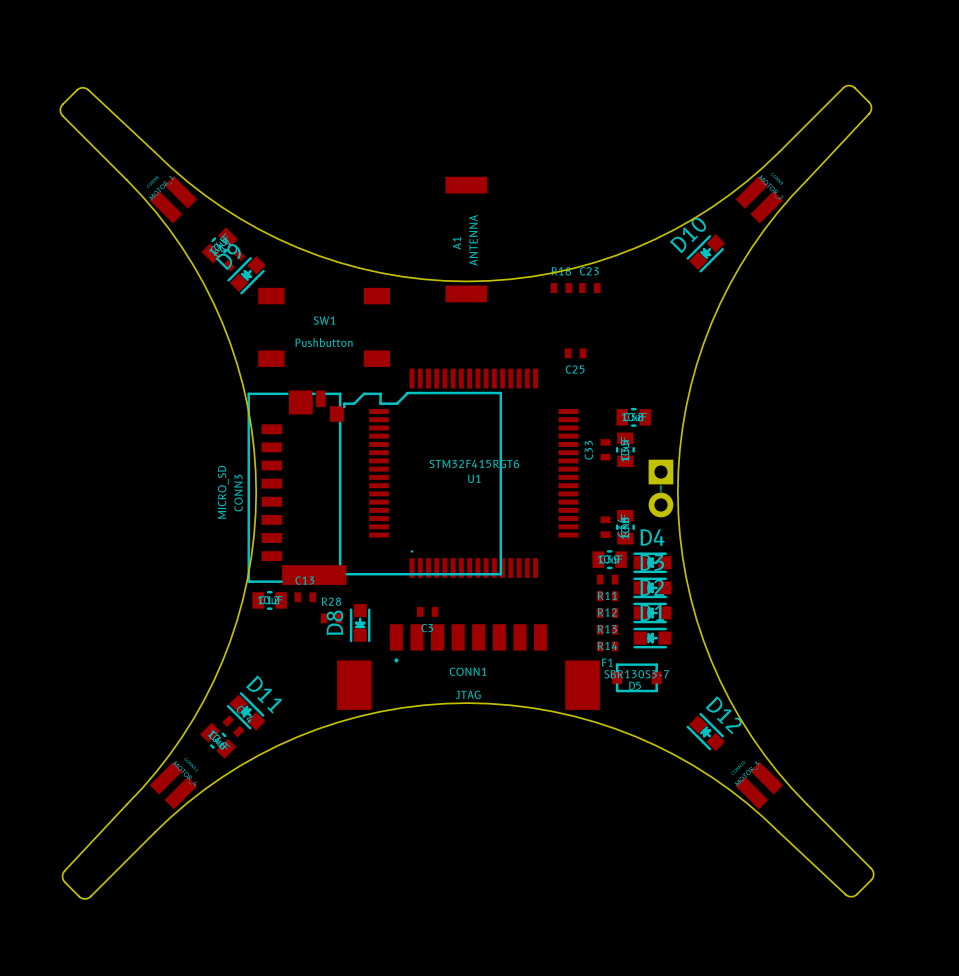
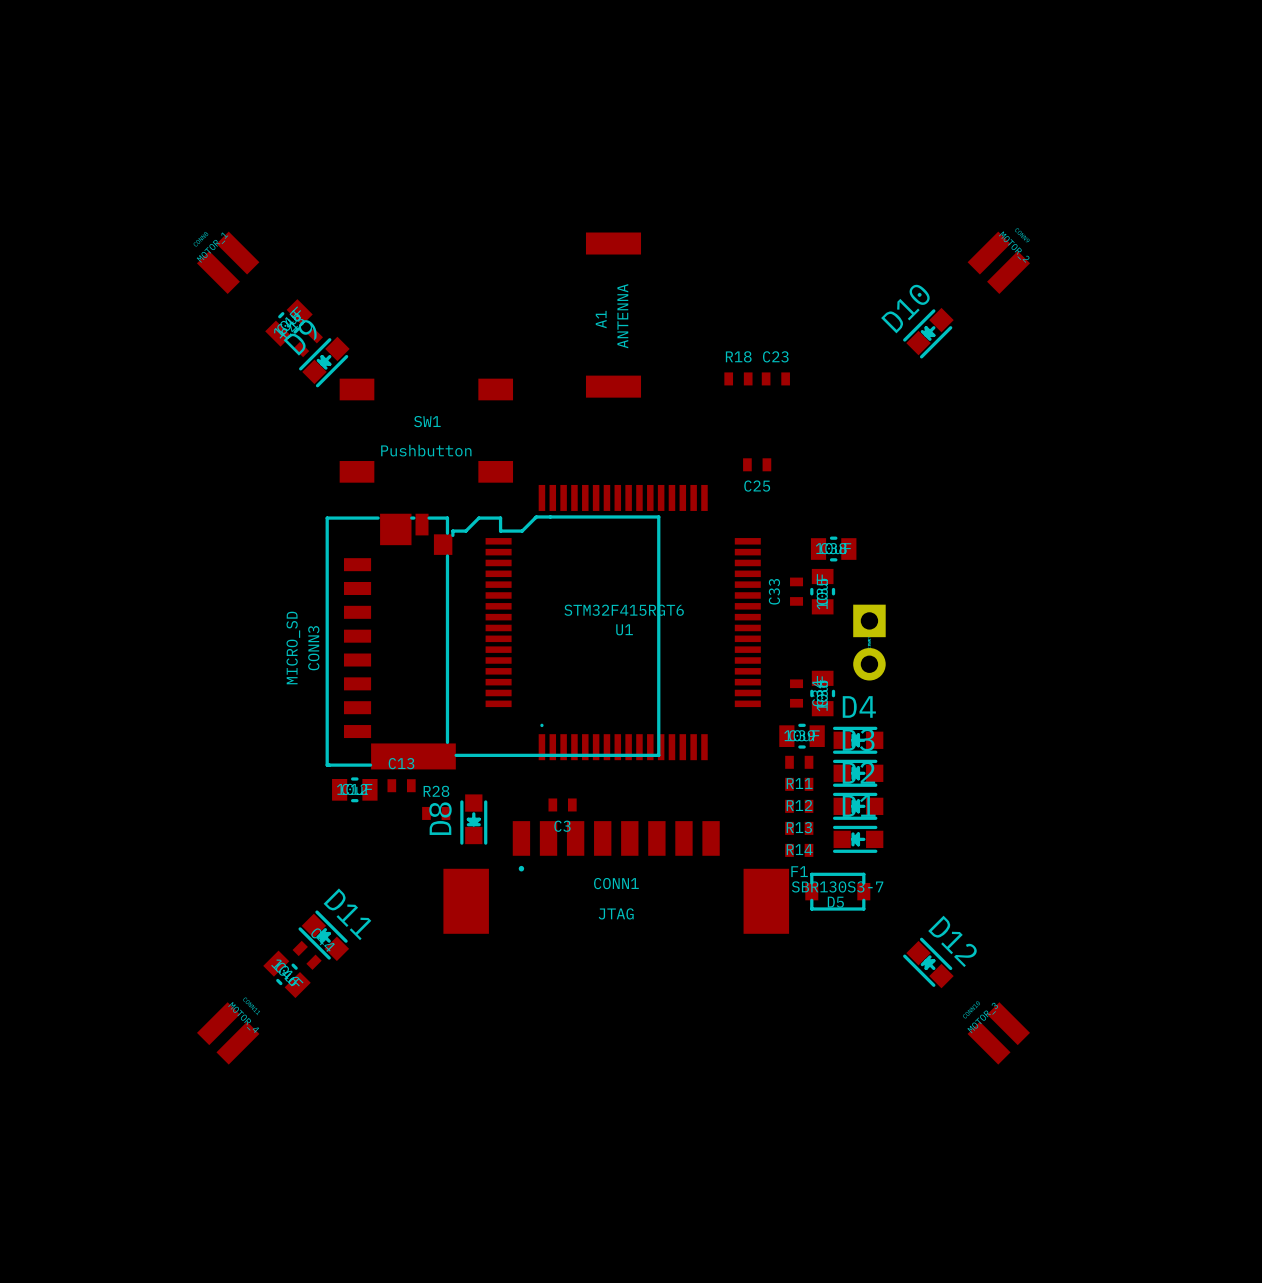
board edge: (843, 88) (747, 181) (712, 207) (675, 229) (615, 255) (574, 268) (531, 276) (467, 281) (423, 279) (380, 272) (338, 262) (298, 247) (258, 229) (204, 194) (170, 167) (86, 88) (78, 88) (62, 104) (60, 109) (62, 115) (141, 195) (169, 229) (193, 265) (213, 303) (230, 343) (242, 384) (254, 448) (256, 492) (254, 535) (247, 578) (237, 620) (222, 661) (193, 719) (169, 755) (141, 788) (63, 872) (63, 880) (79, 896) (83, 898) (90, 897) (170, 817) (204, 790) (240, 765) (278, 745) (318, 728) (380, 711) (423, 705) (467, 703) (510, 705) (553, 711) (595, 722) (635, 736) (675, 755) (730, 790) (763, 817) (847, 895) (855, 895) (871, 880) (873, 875) (871, 869) (778, 772) (752, 737) (729, 700) (703, 641) (691, 599) (682, 557) (678, 513) (678, 470) (682, 427) (691, 384) (711, 323) (729, 284) (764, 229) (792, 195) (870, 111) (870, 103) (854, 87) (848, 85) (843, 88) -> none

